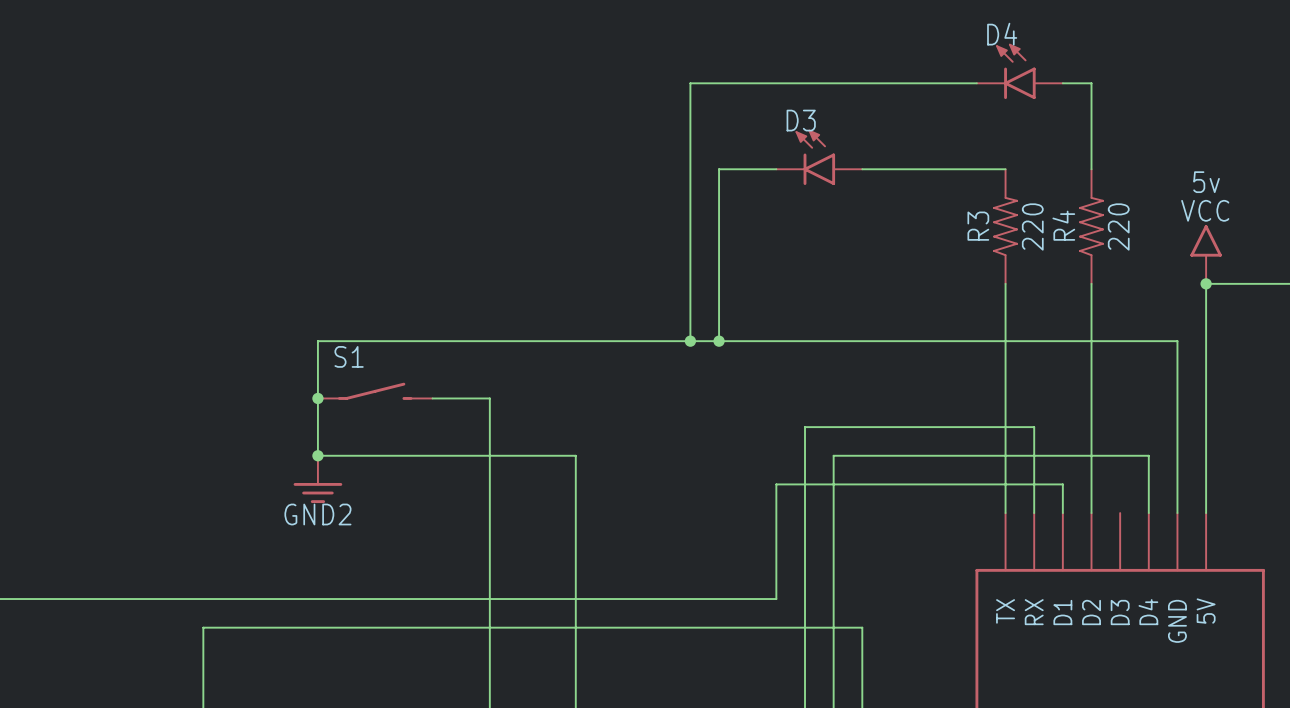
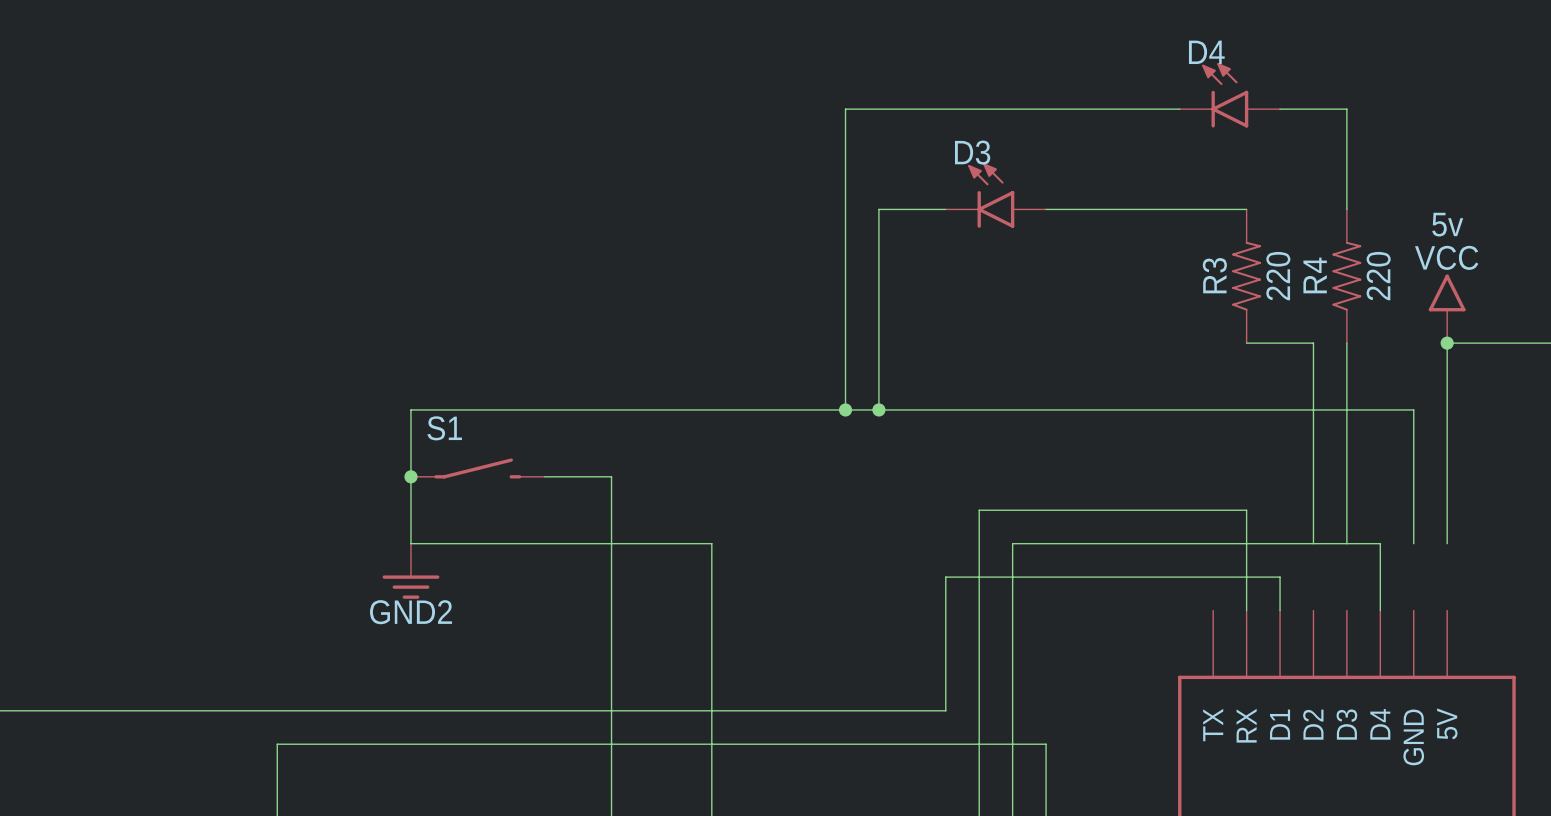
wire: (1091, 83) (1091, 169) -> (1313, 109) (1346, 109) (1346, 209)
wire: none -> (1213, 209) (1246, 209)
R3 position: (1005, 226) -> (1246, 276)
R4 position: (1091, 226) -> (1346, 276)
wire: (1005, 283) (1005, 513) -> none
wire: none -> (1246, 343) (1313, 343)
wire: none -> (1346, 343) (1346, 543)
junction: (317, 455) -> none
wire: (1091, 455) (1091, 513) -> none
wire: (1177, 455) (1177, 513) -> none
wire: (1206, 455) (1206, 513) -> none

